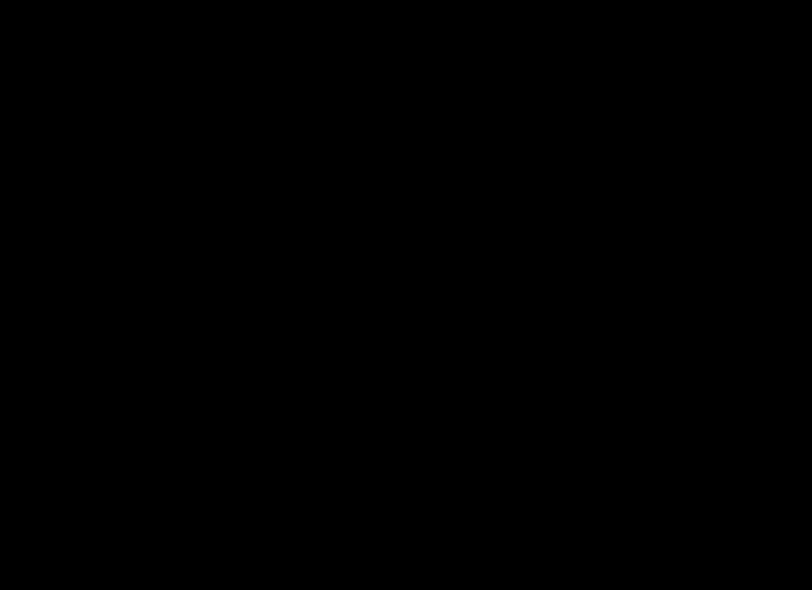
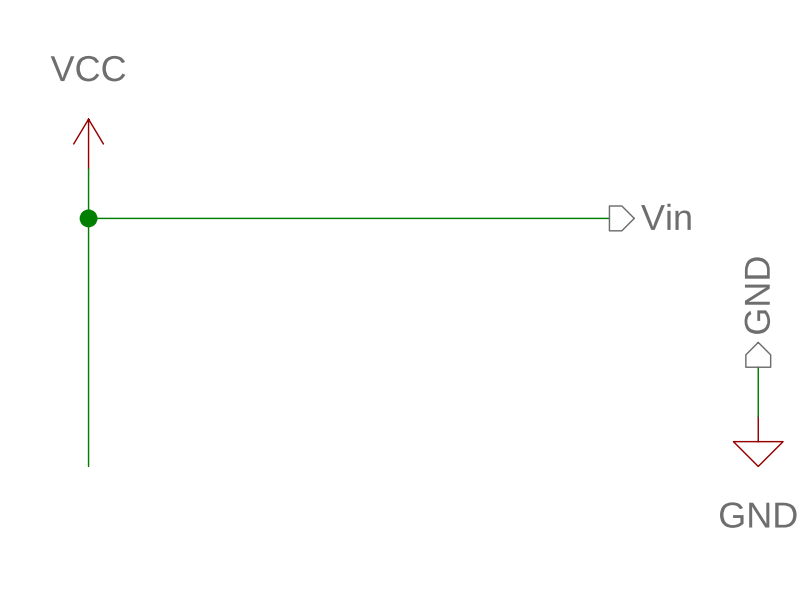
power symbol: none -> VCC (88, 143)
wire: none -> (88, 168) (88, 466)
sheet pin: none -> Vin (665, 216)
wire: none -> (88, 218) (609, 218)
junction: none -> (88, 218)
sheet pin: none -> GND (757, 295)
wire: none -> (758, 367) (758, 416)
power symbol: none -> GND (758, 441)

